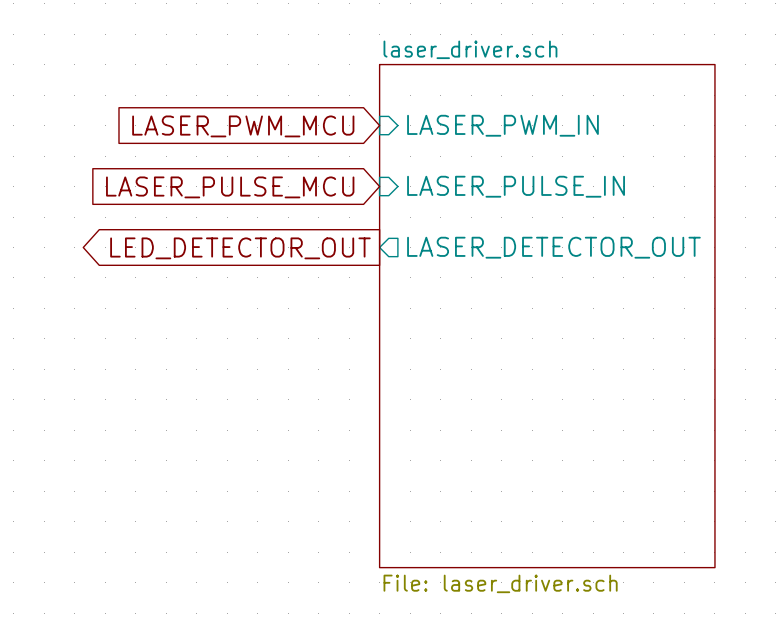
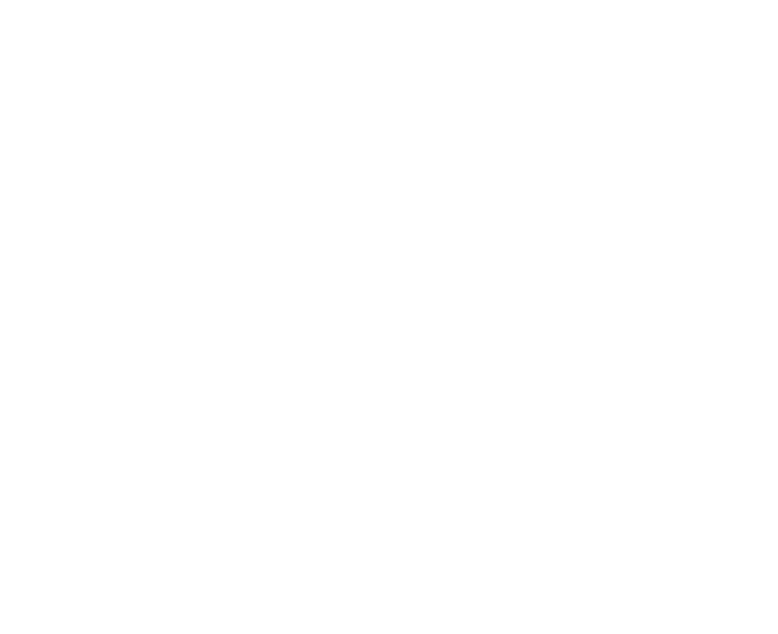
sheet pin: LASER_PWM_IN (502, 125) -> none
global label: LASER_PWM_MCU (243, 126) -> none
sheet pin: LASER_PULSE_IN (516, 186) -> none
global label: LASER_PULSE_MCU (230, 187) -> none
sheet pin: LASER_DETECTOR_OUT (553, 247) -> none
global label: LED_DETECTOR_OUT (240, 248) -> none
sheet laser_driver.sch: File: laser_driver.sch (547, 316) -> none

